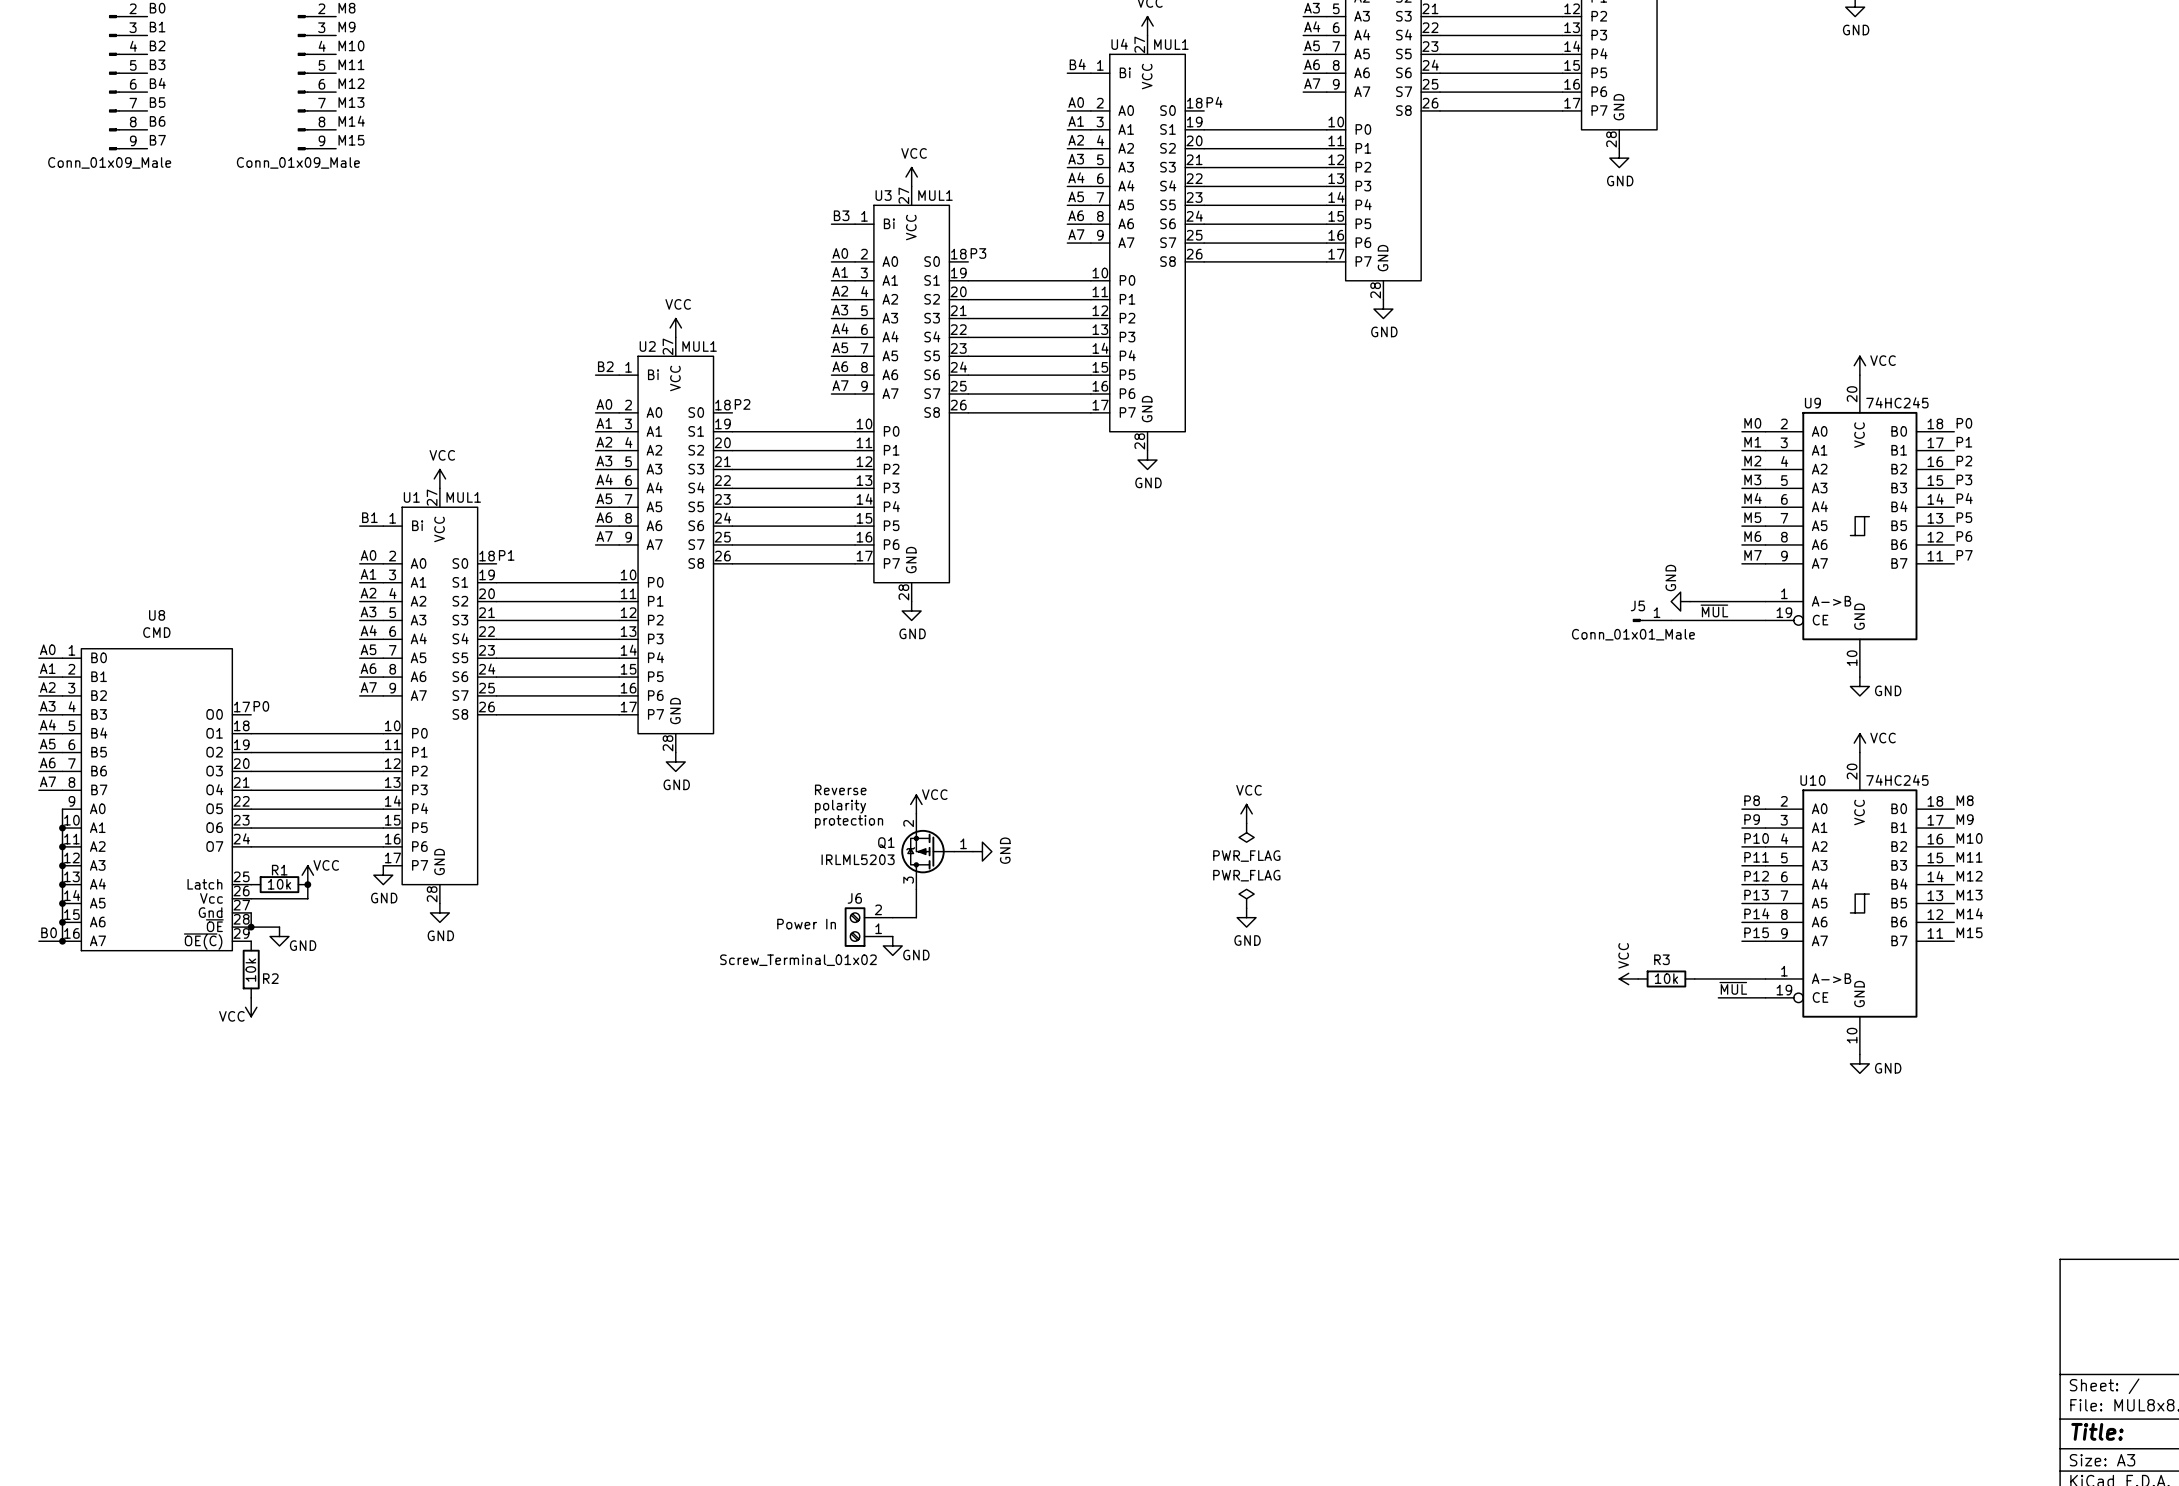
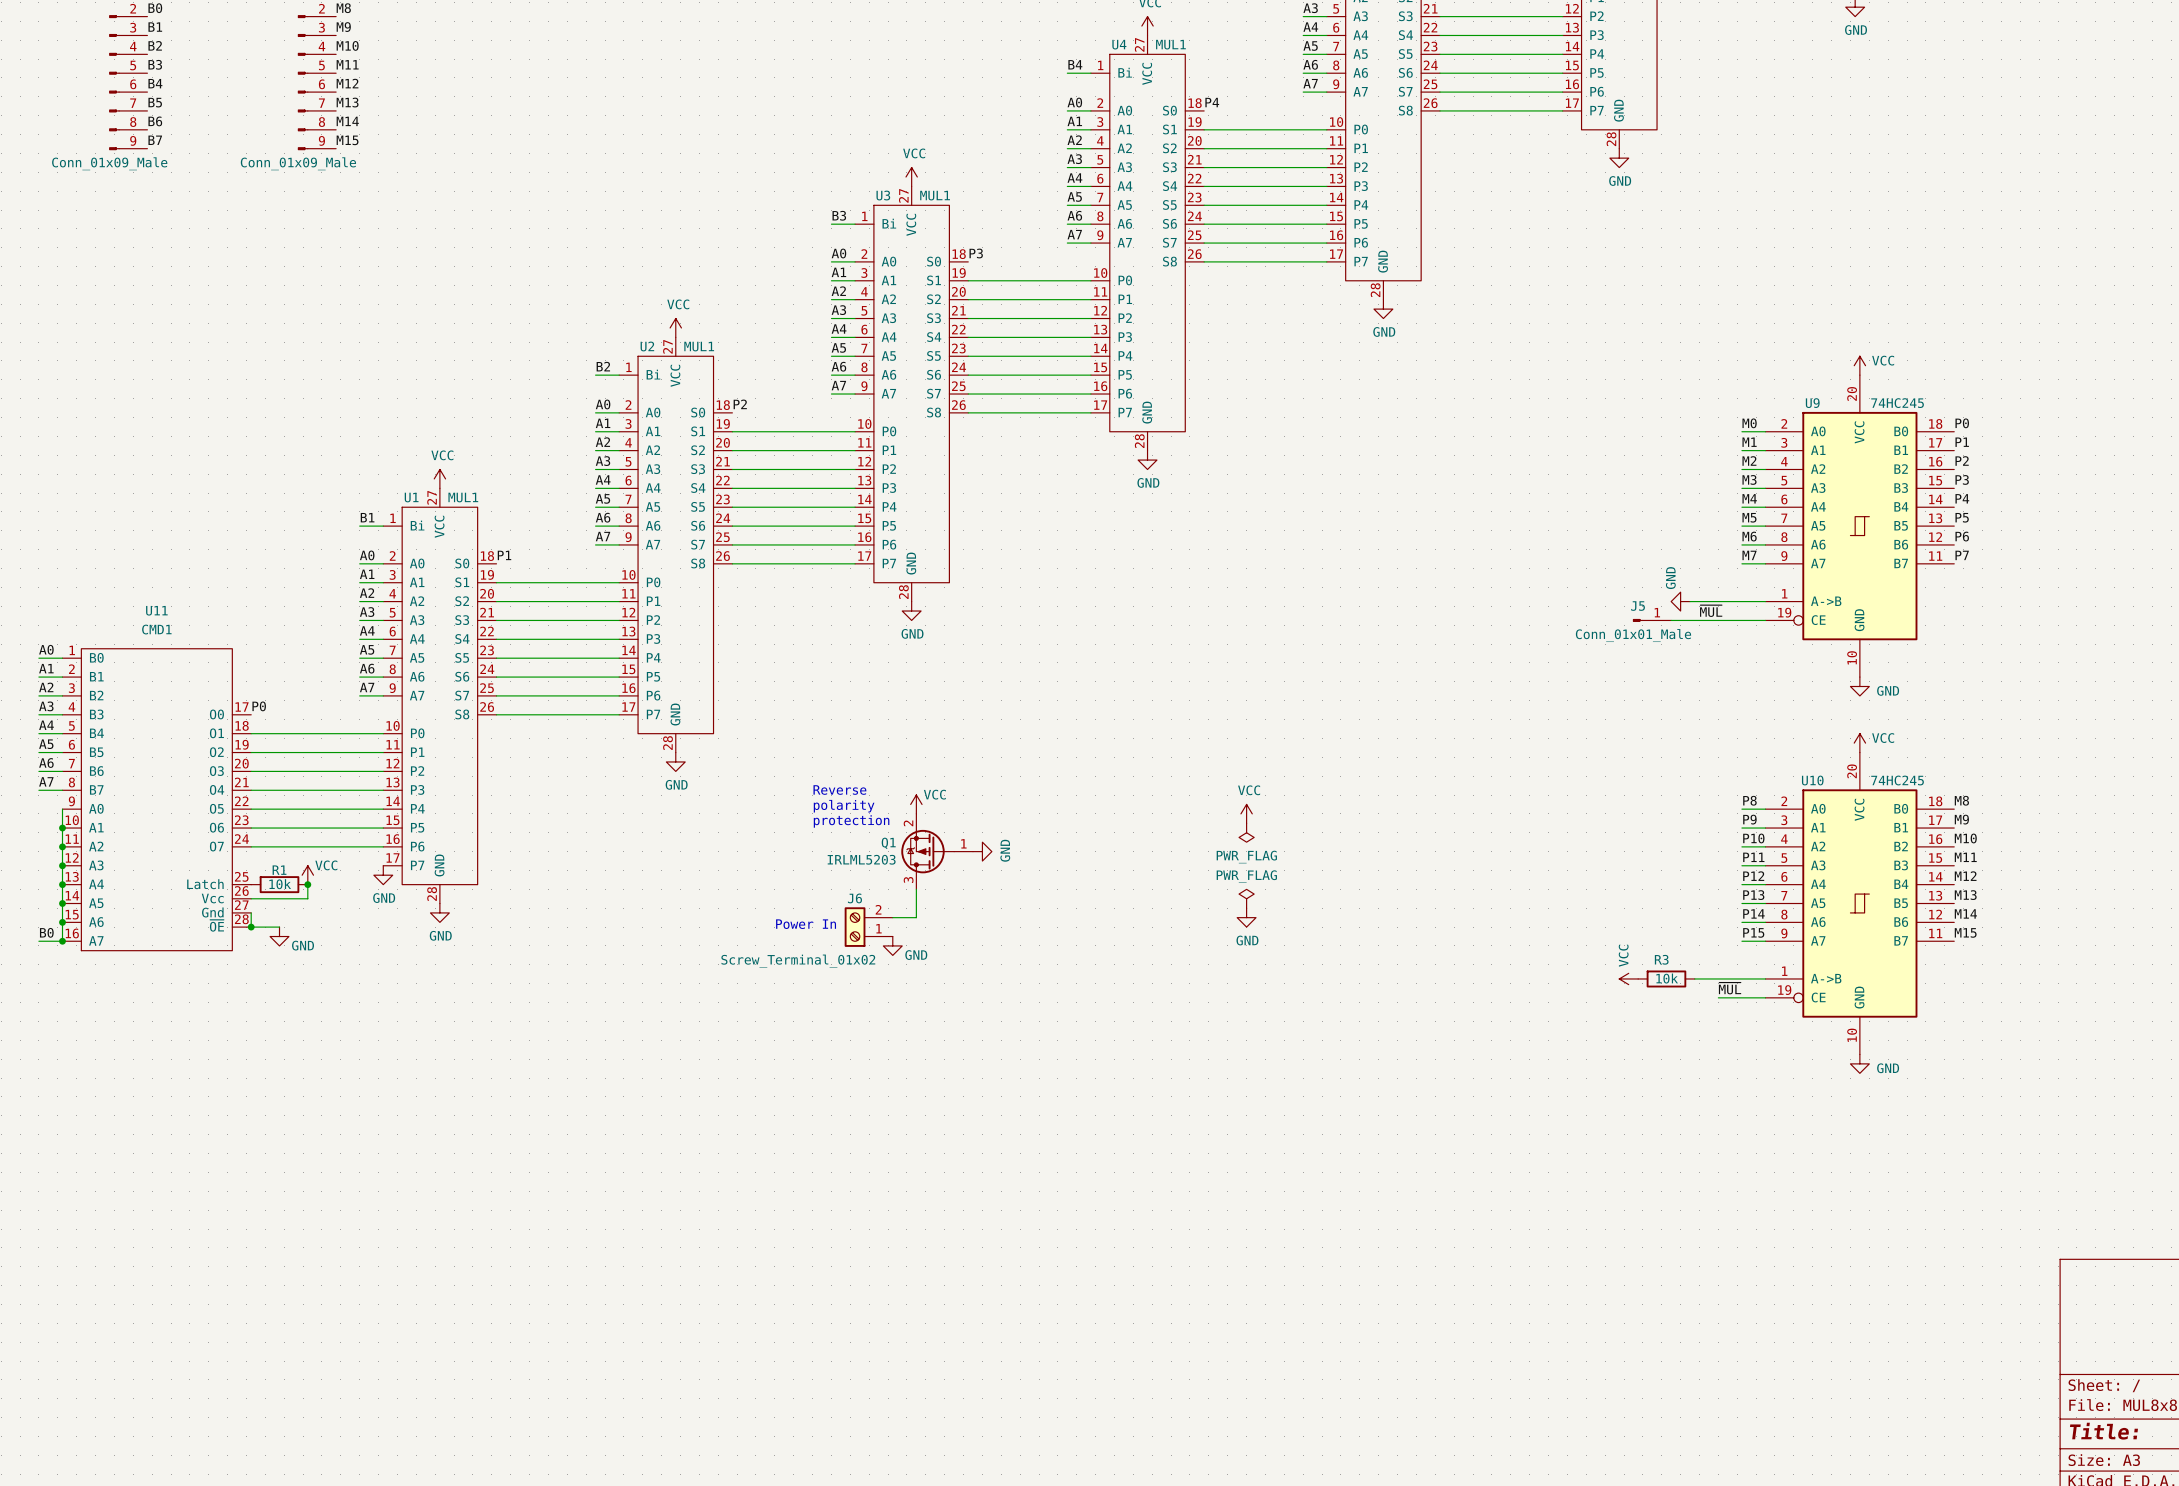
U8: CMD (156, 799) -> none
U11: none -> CMD1 (156, 799)
R2: 10k (251, 969) -> none
power symbol: VCC (251, 1007) -> none

